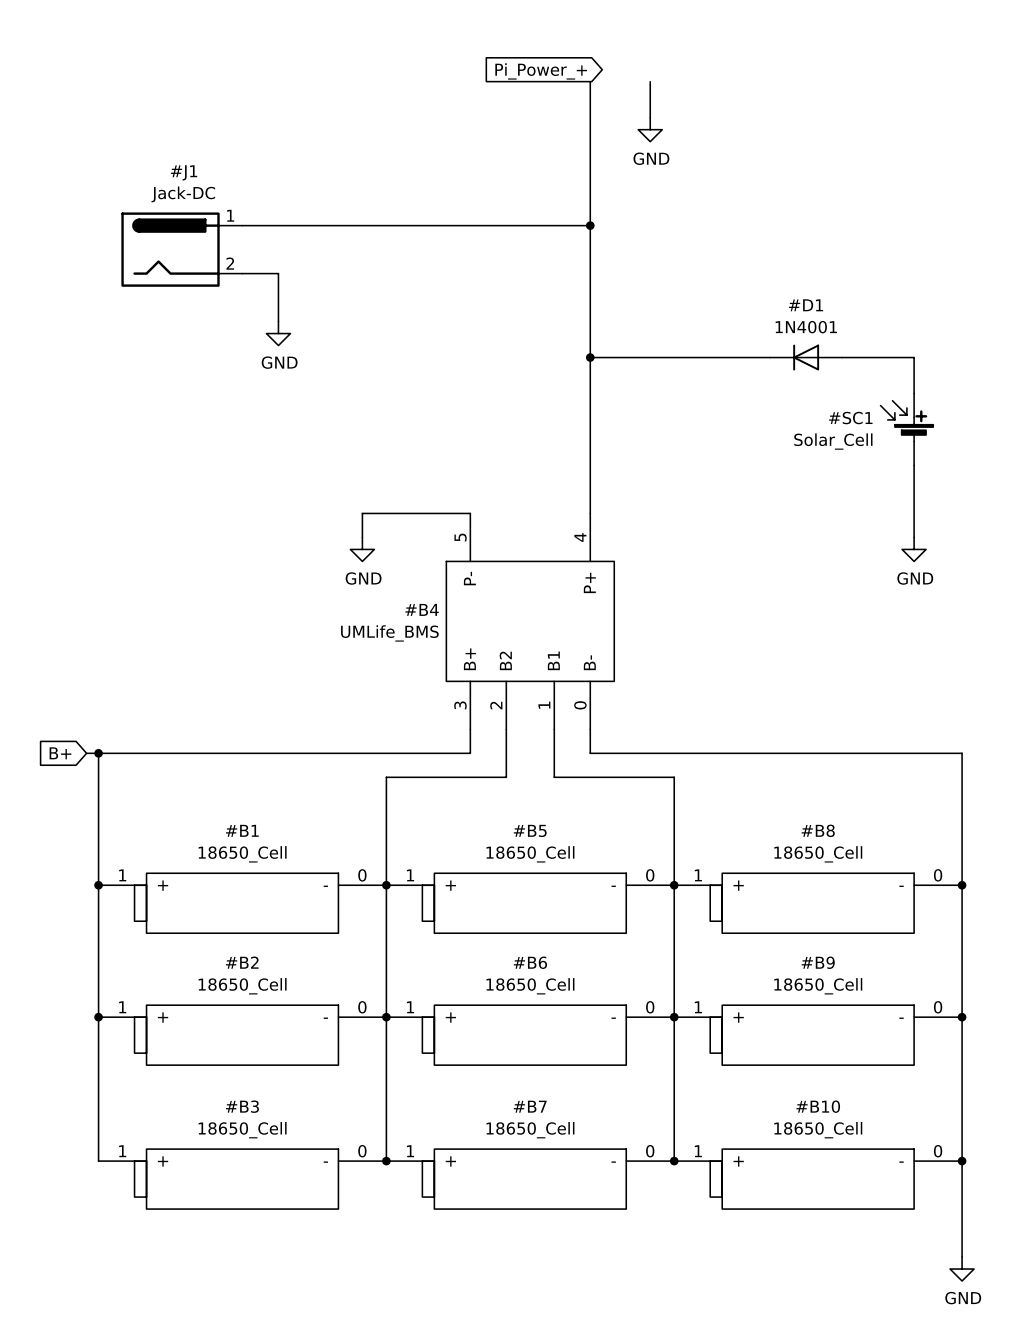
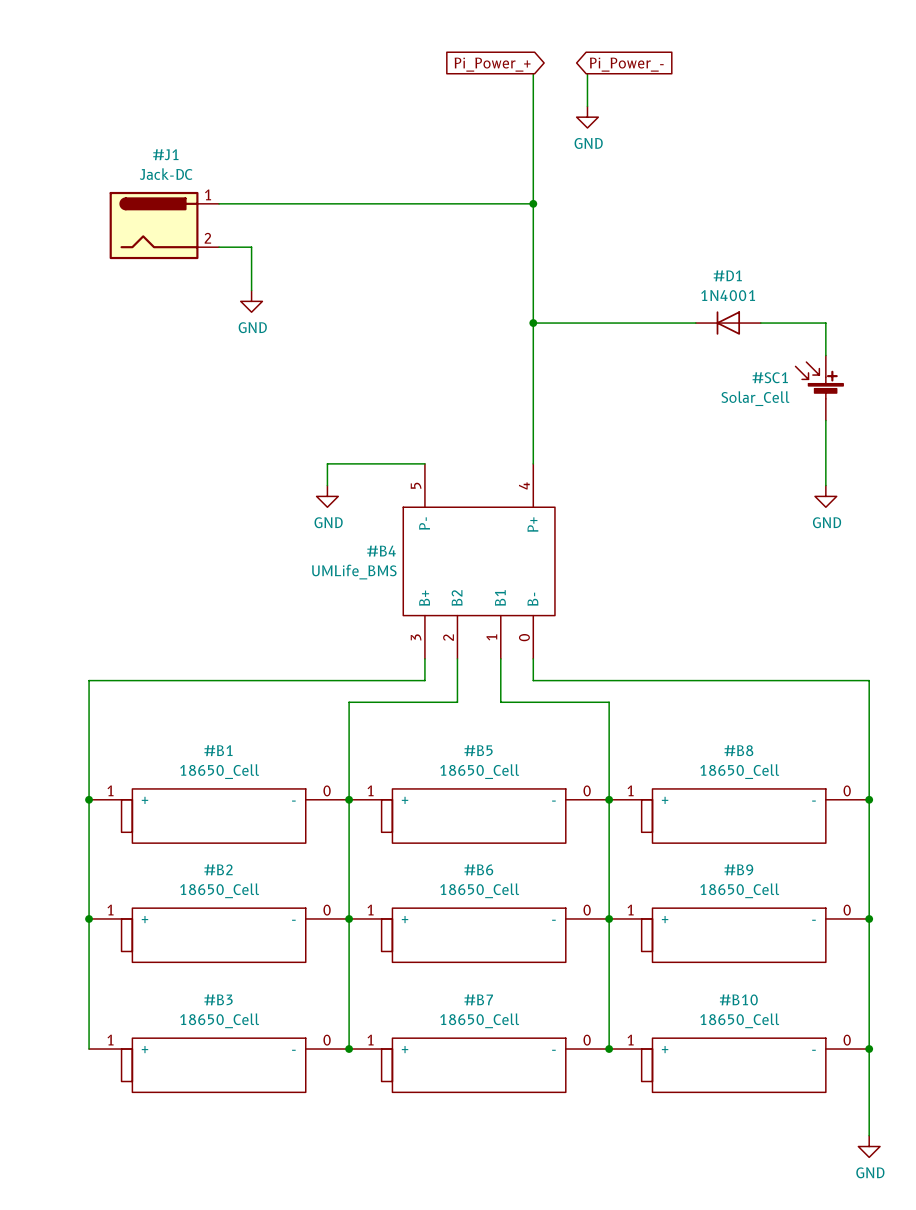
global label: none -> Pi_Power_- (626, 64)
global label: B+ (60, 753) -> none
wire: (86, 753) (98, 753) -> none
junction: (98, 753) -> none

